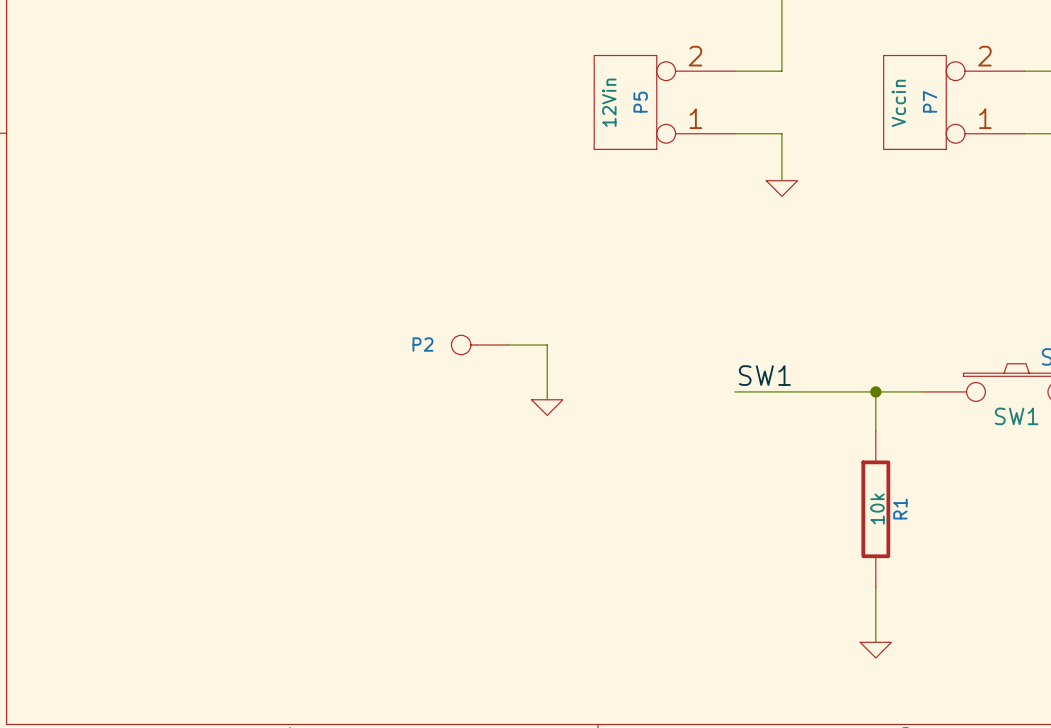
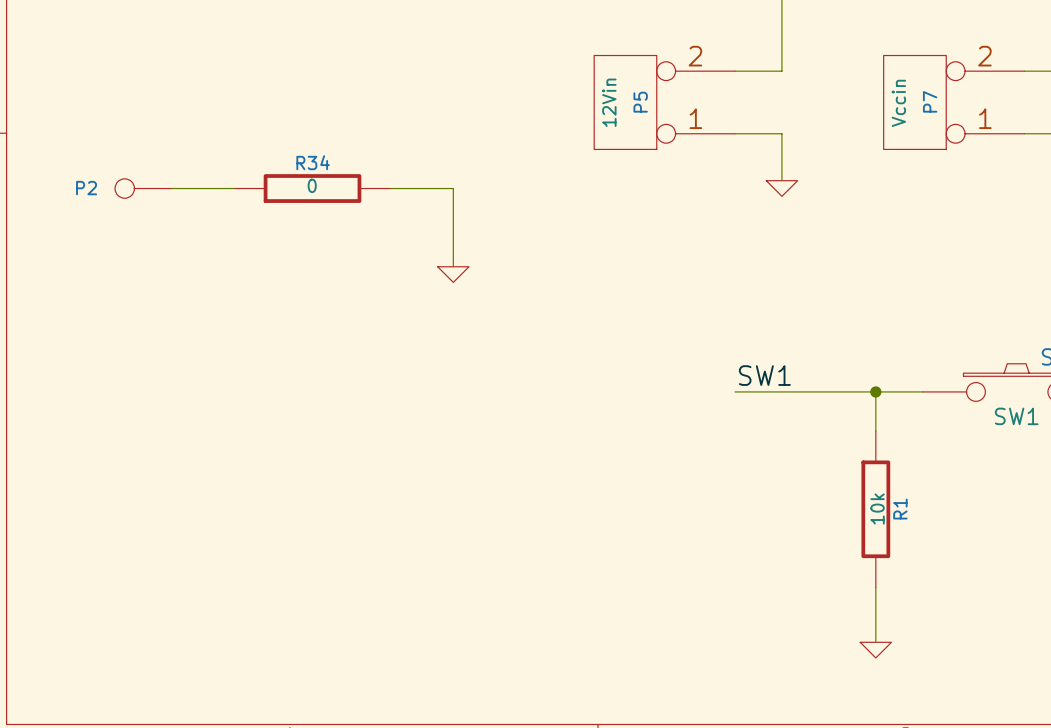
wire: none -> (171, 188) (234, 188)
R34: none -> 0 (312, 188)
wire: none -> (390, 188) (453, 188) (453, 266)
P2 position: (479, 345) -> (143, 188)
wire: (508, 345) (547, 345) (547, 399) -> none
power symbol position: (547, 407) -> (453, 274)

